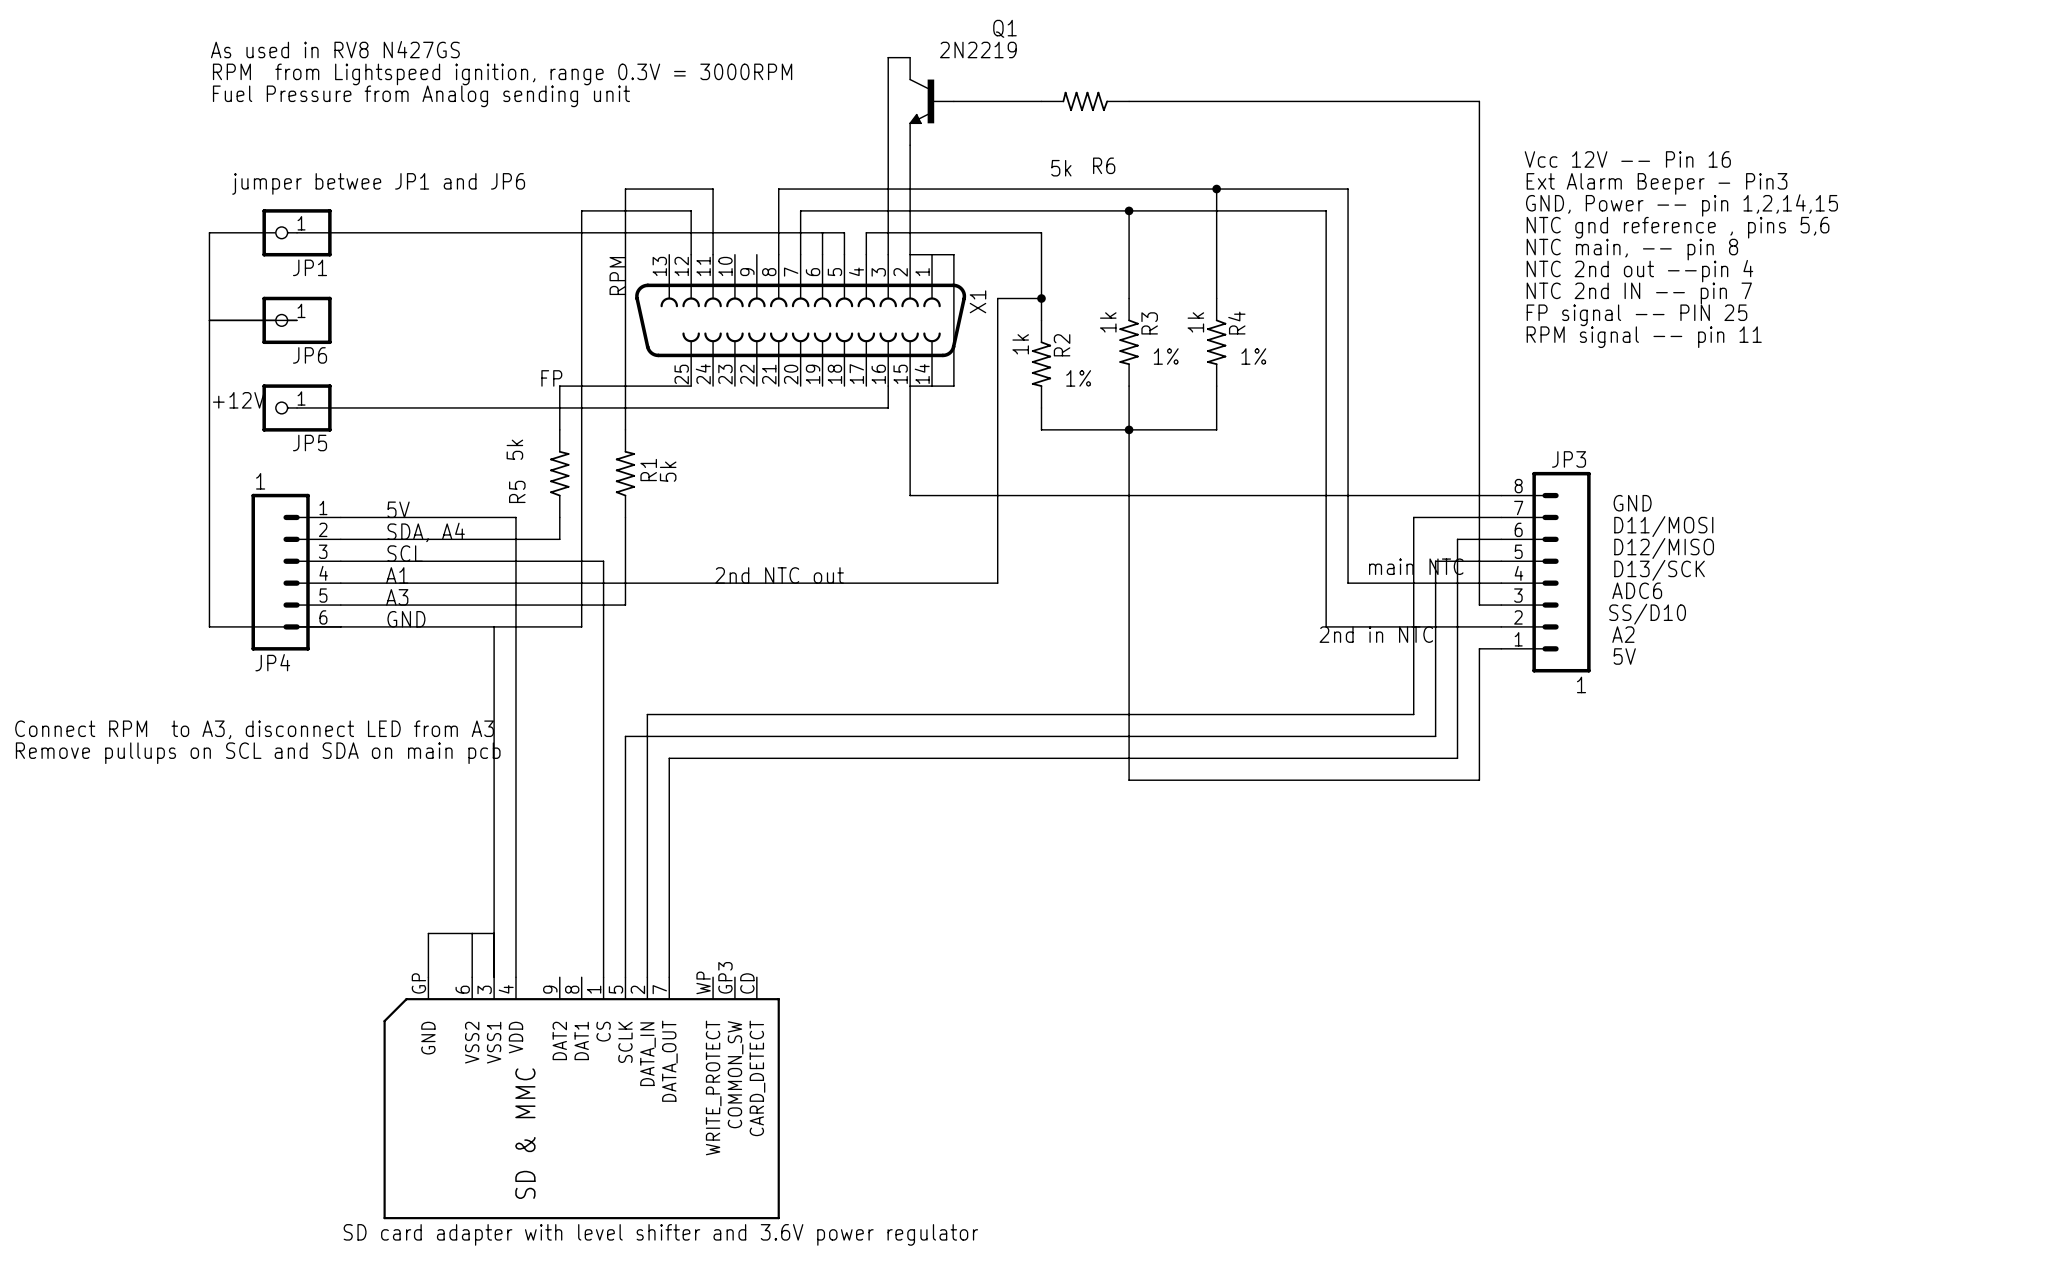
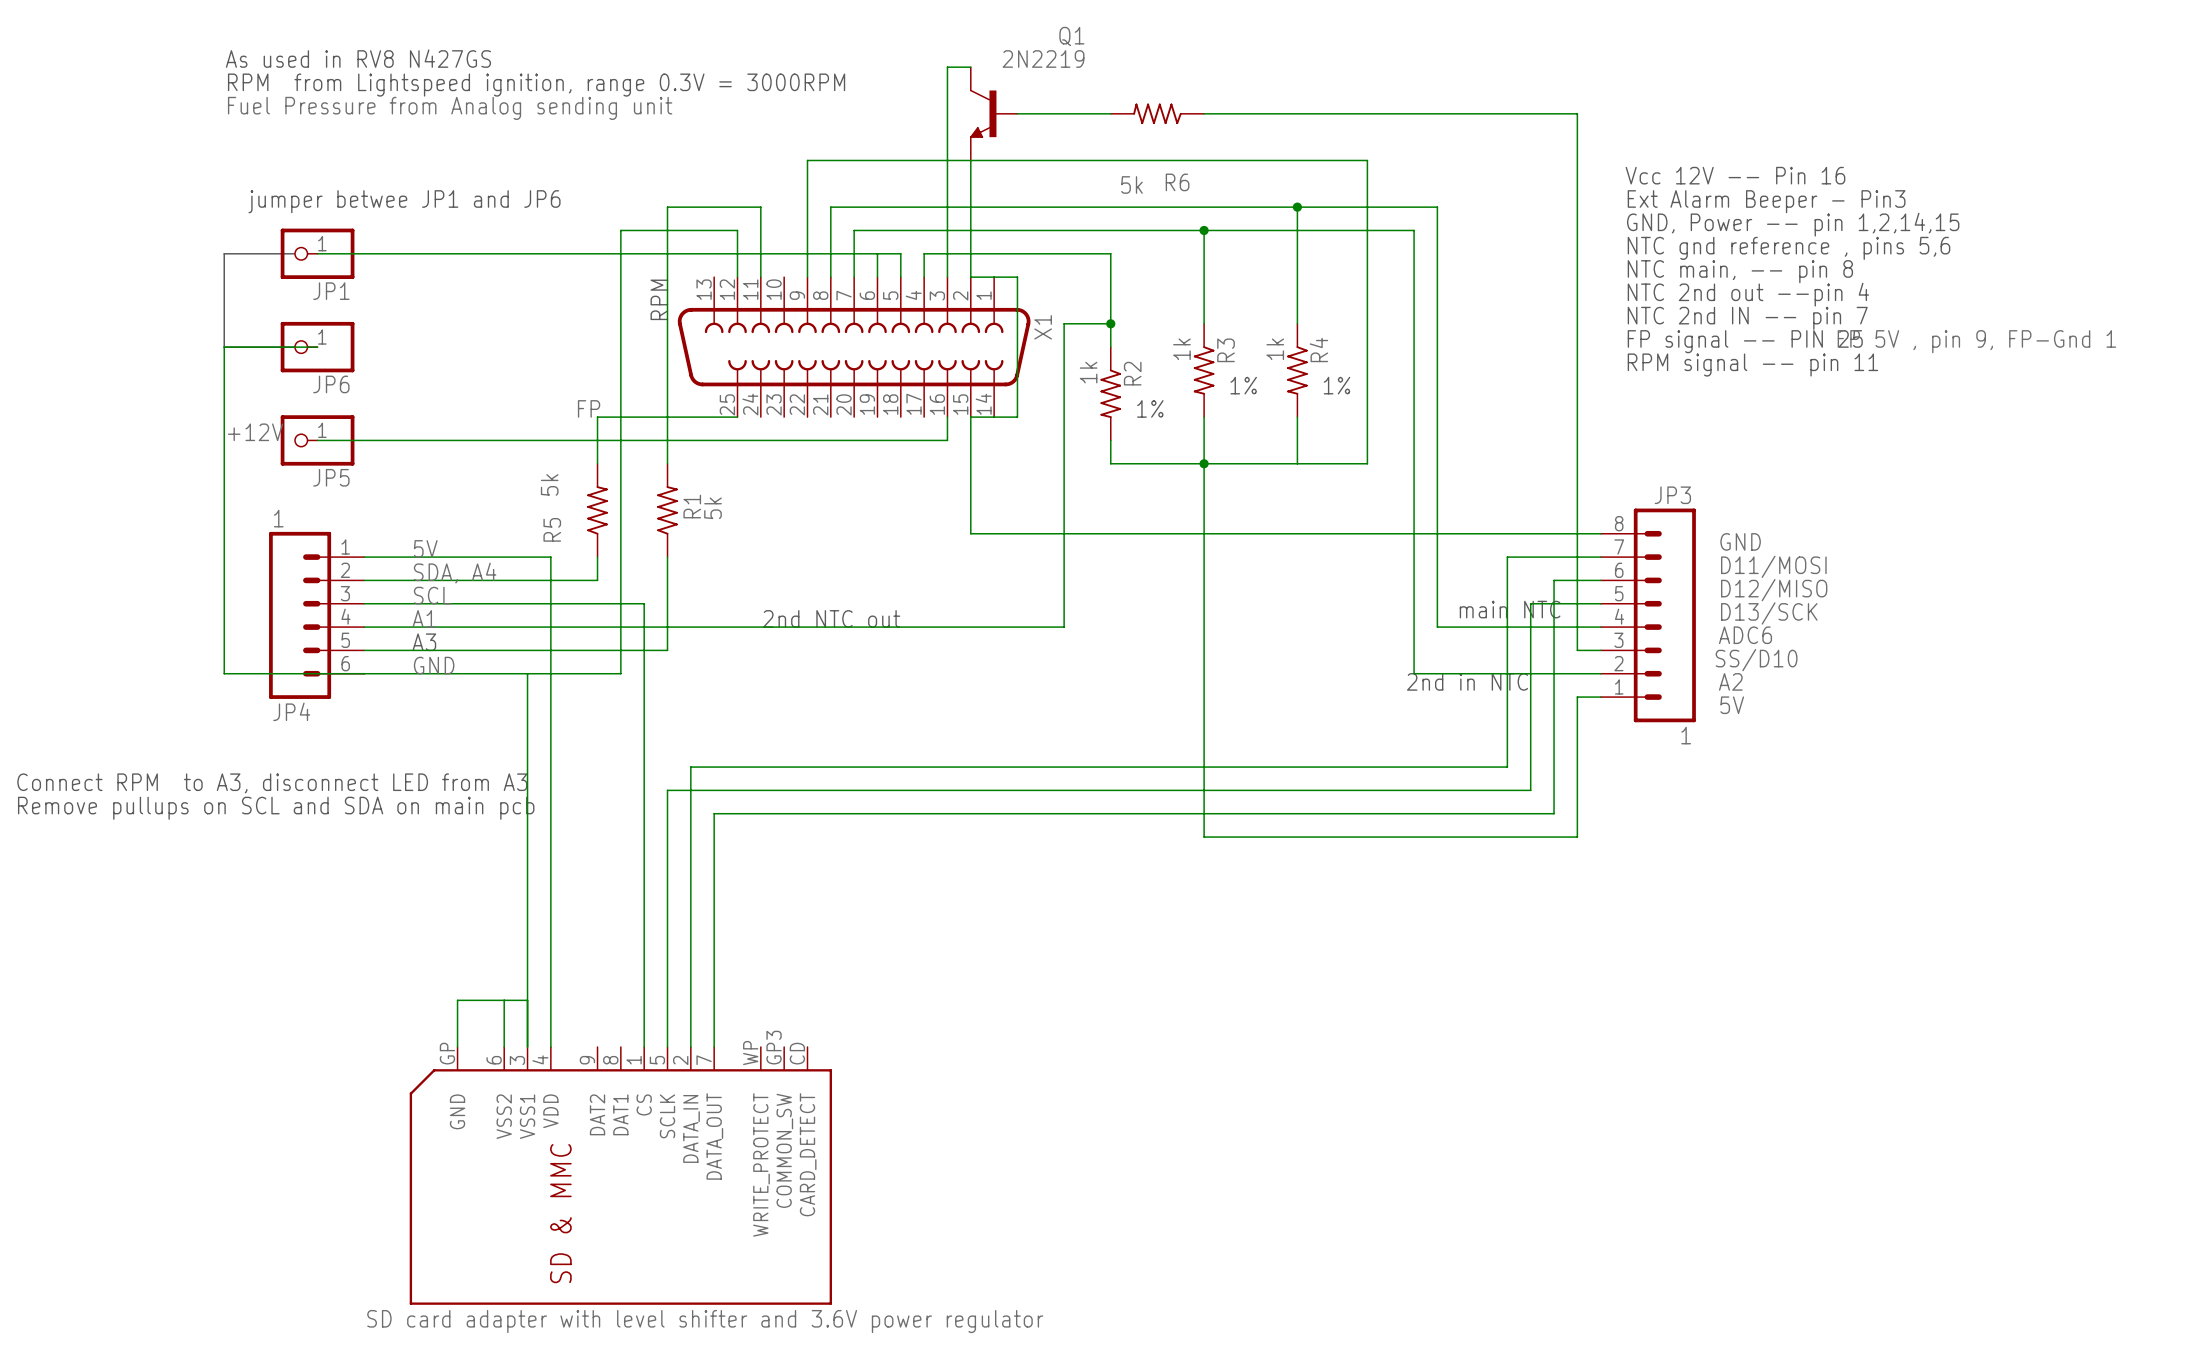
wire: none -> (807, 277) (807, 160) (1367, 160) (1367, 463) (1297, 463)
text: none -> FP 5V , pin 9, FP-Gnd 1 (1976, 341)

